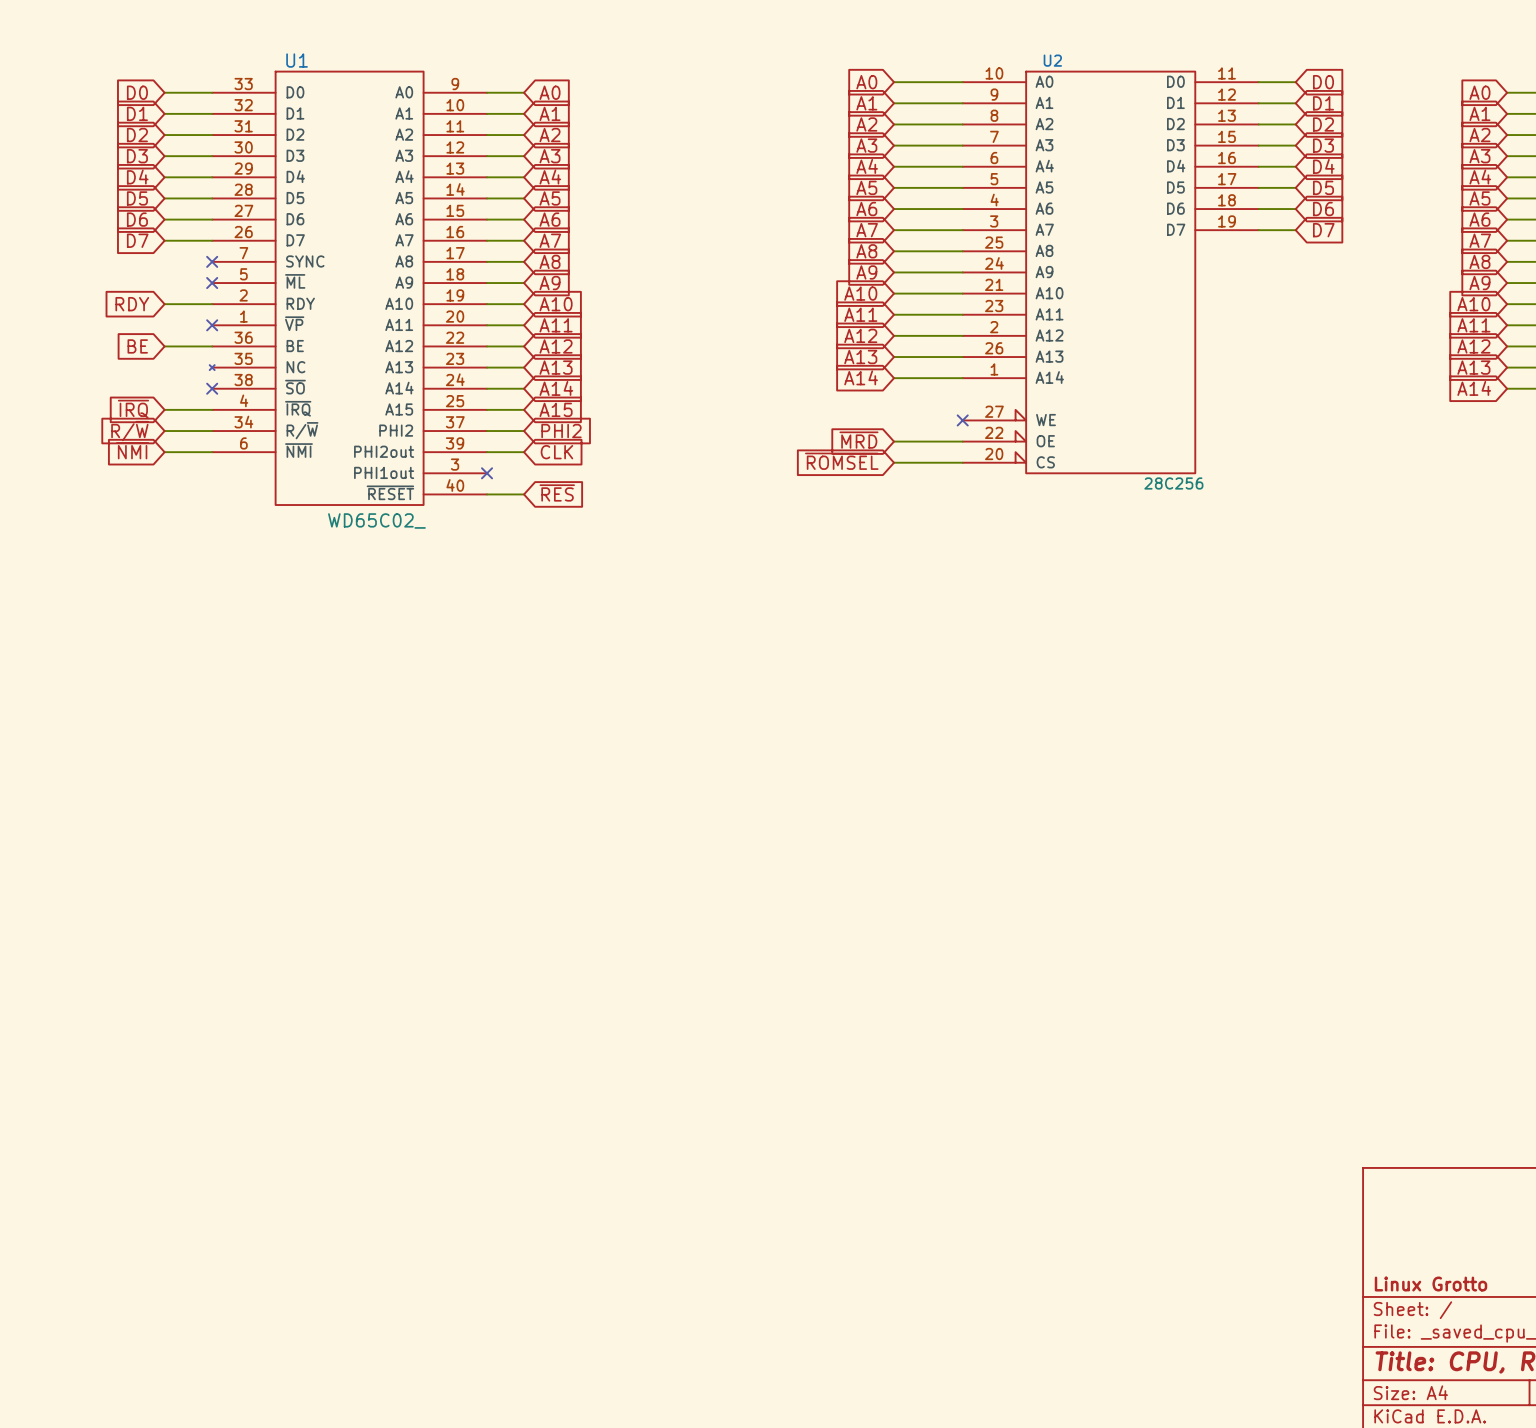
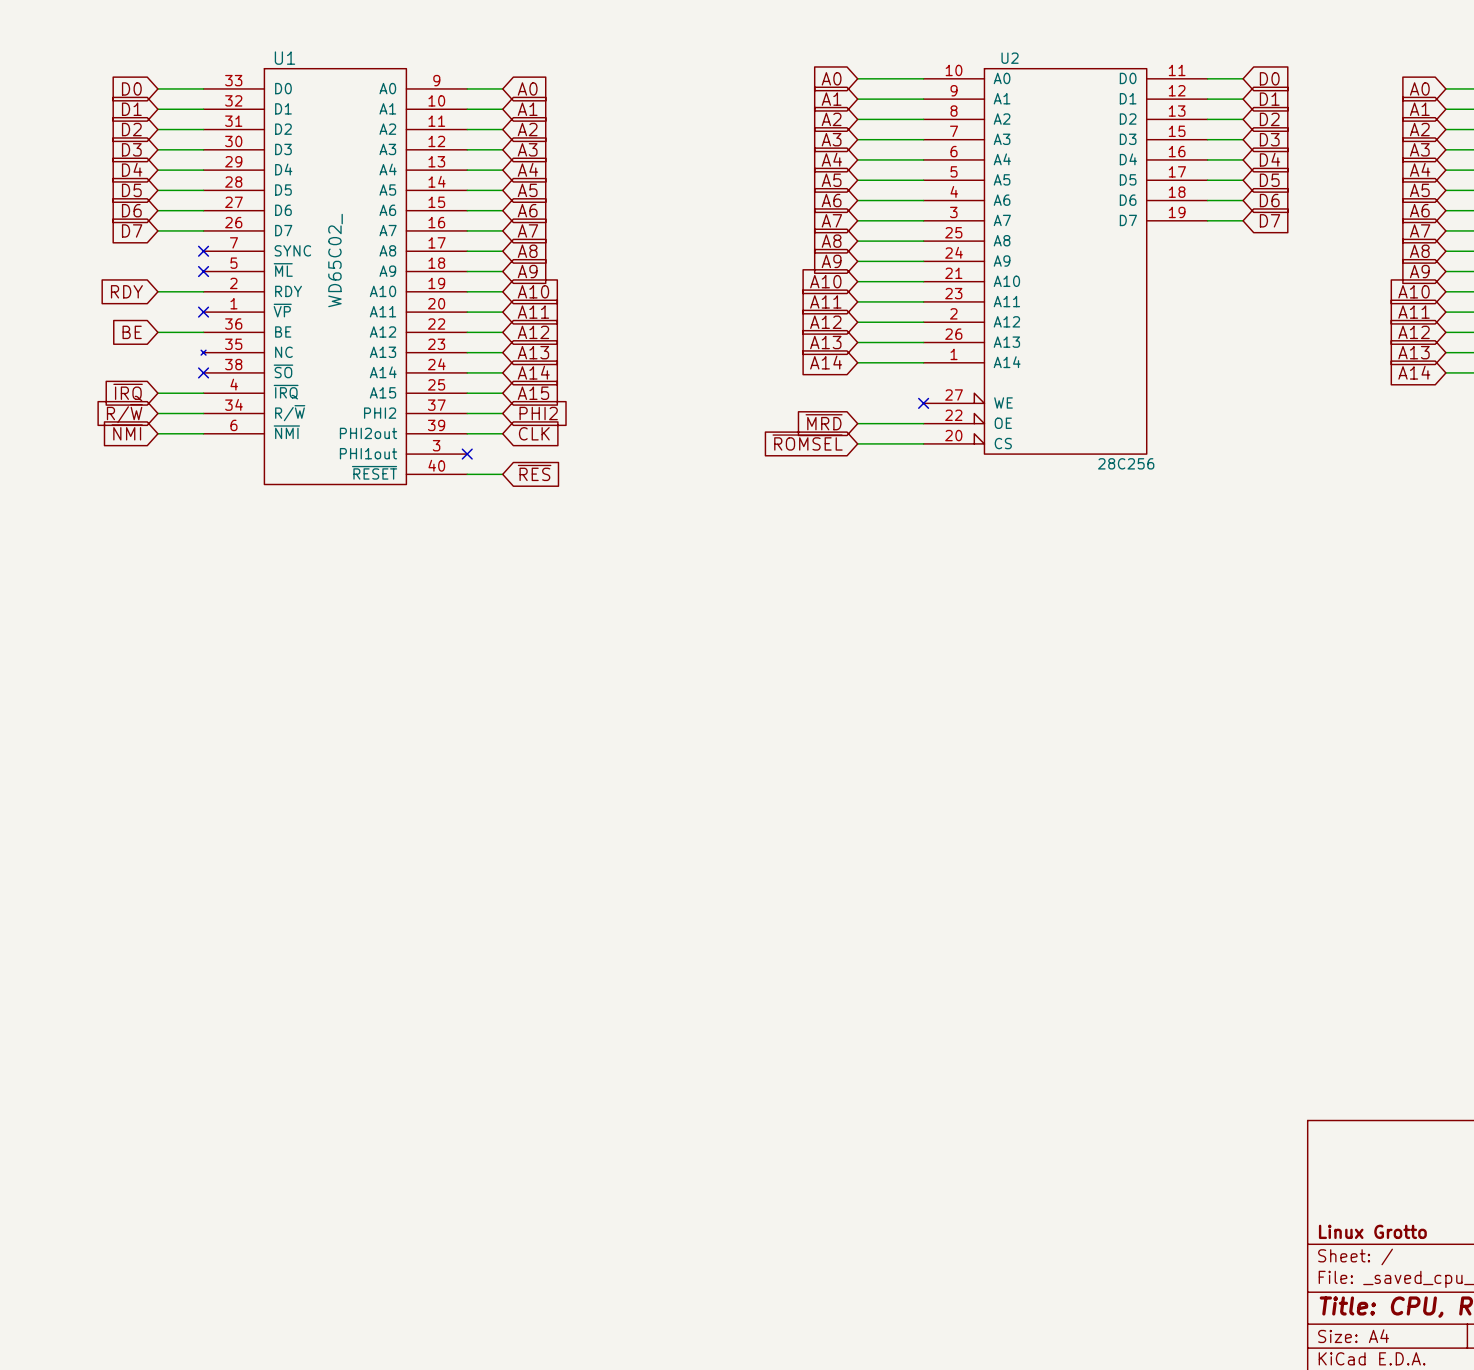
U1 value rotation: 0° (376, 521) -> 90° counterclockwise (335, 260)
U1 value position: WD65C02_ (376, 521) -> WD65C02_ (335, 260)

